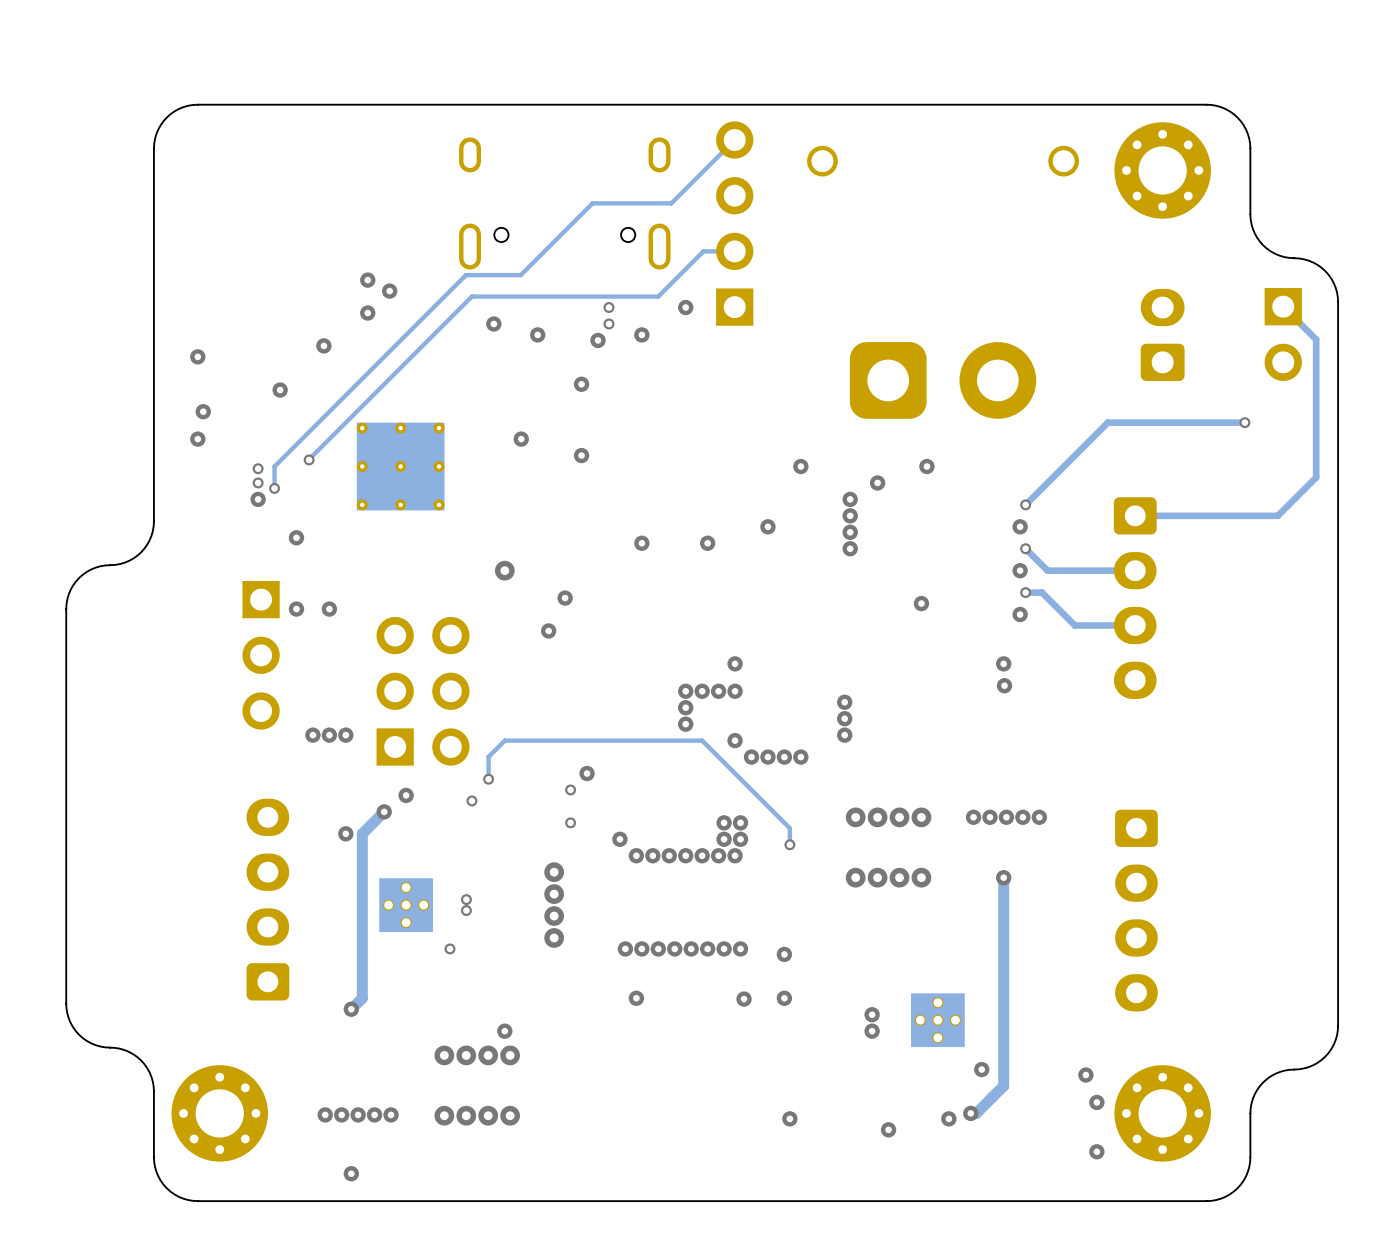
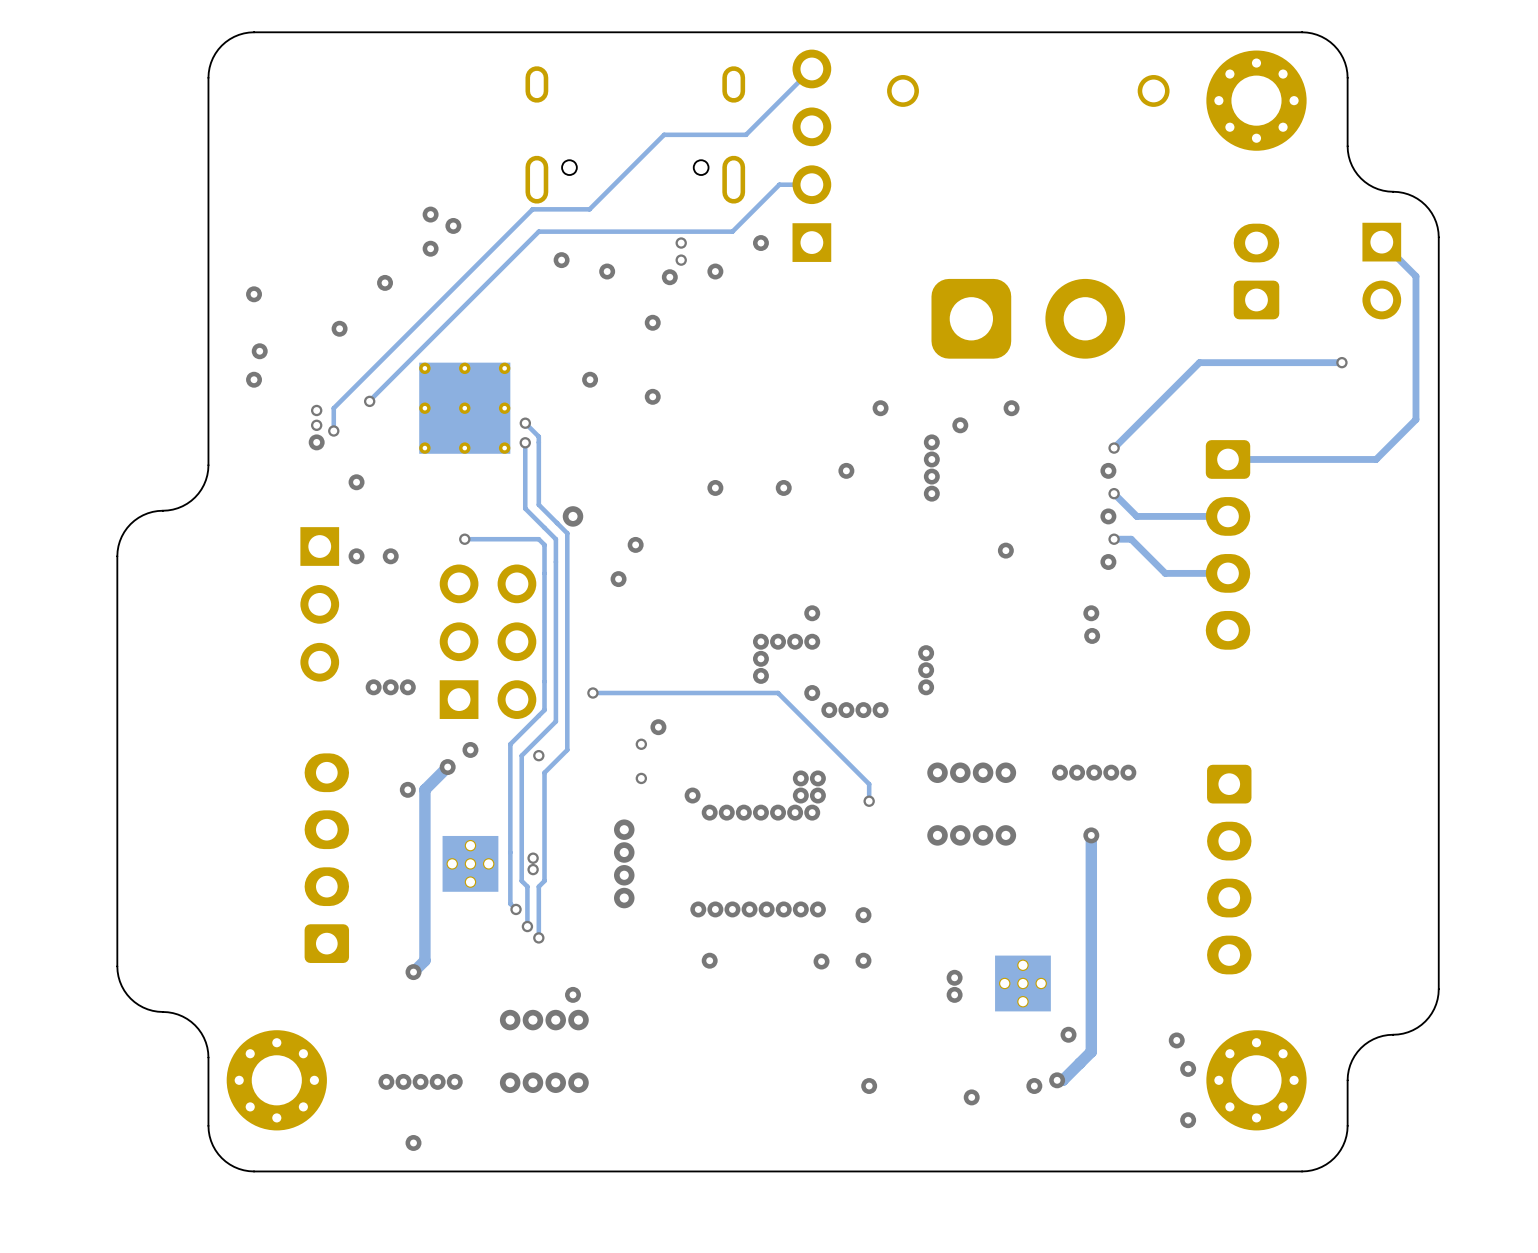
track: none -> (525, 423) (538, 436) (538, 504) (567, 533) (567, 749) (544, 772) (544, 880) (538, 886) (538, 937)
via: none -> (525, 423)
track: none -> (525, 442) (525, 508) (555, 539) (555, 721) (521, 755) (521, 880) (527, 886) (527, 926)
via: none -> (525, 442)
track: none -> (464, 539) (538, 539) (544, 544) (544, 710) (510, 744) (510, 903) (516, 909)
via: none -> (464, 539)
track: (523, 740) (504, 740) (488, 756) (488, 779) -> none
via position: (488, 779) -> (592, 693)
via: none -> (527, 926)
via: none -> (538, 937)

